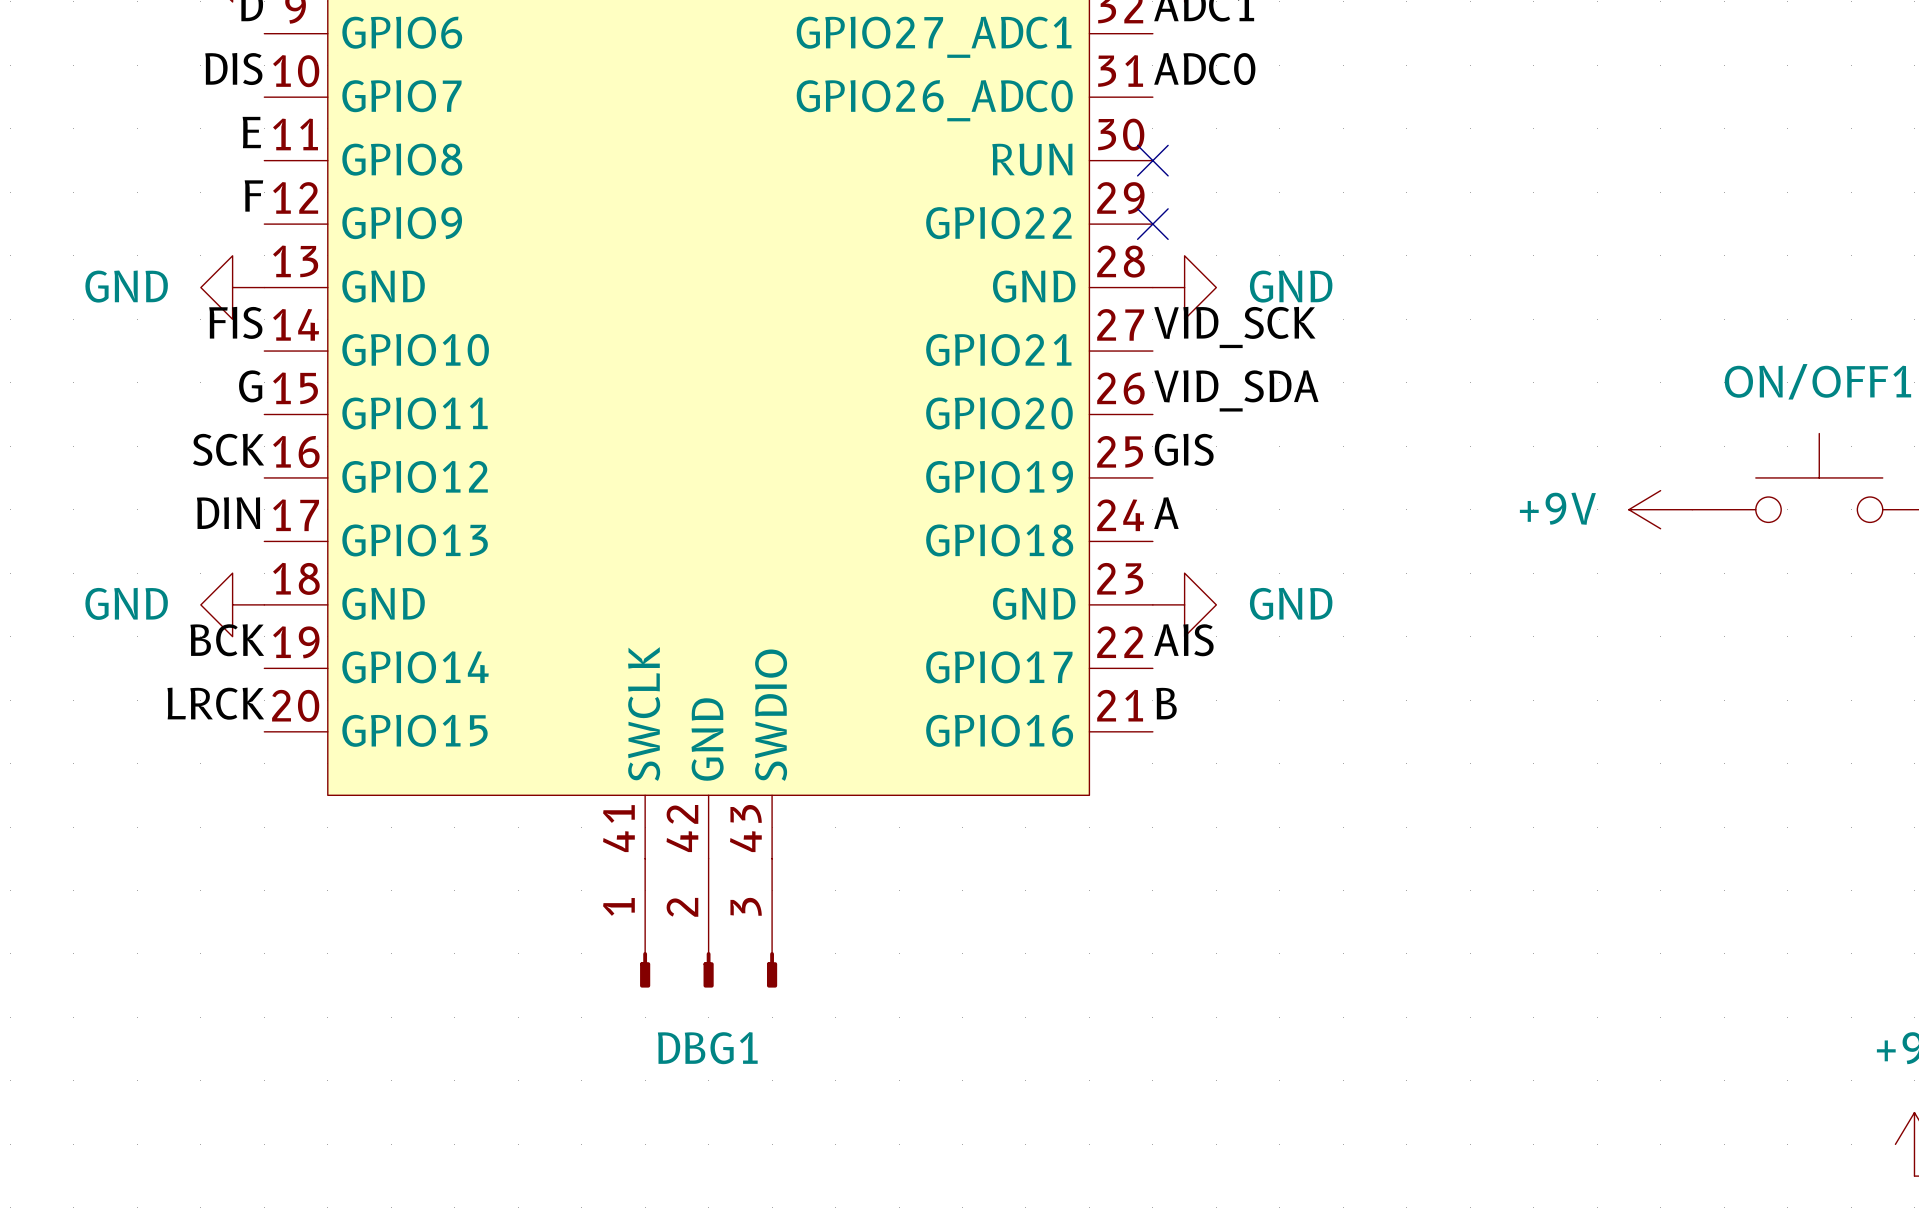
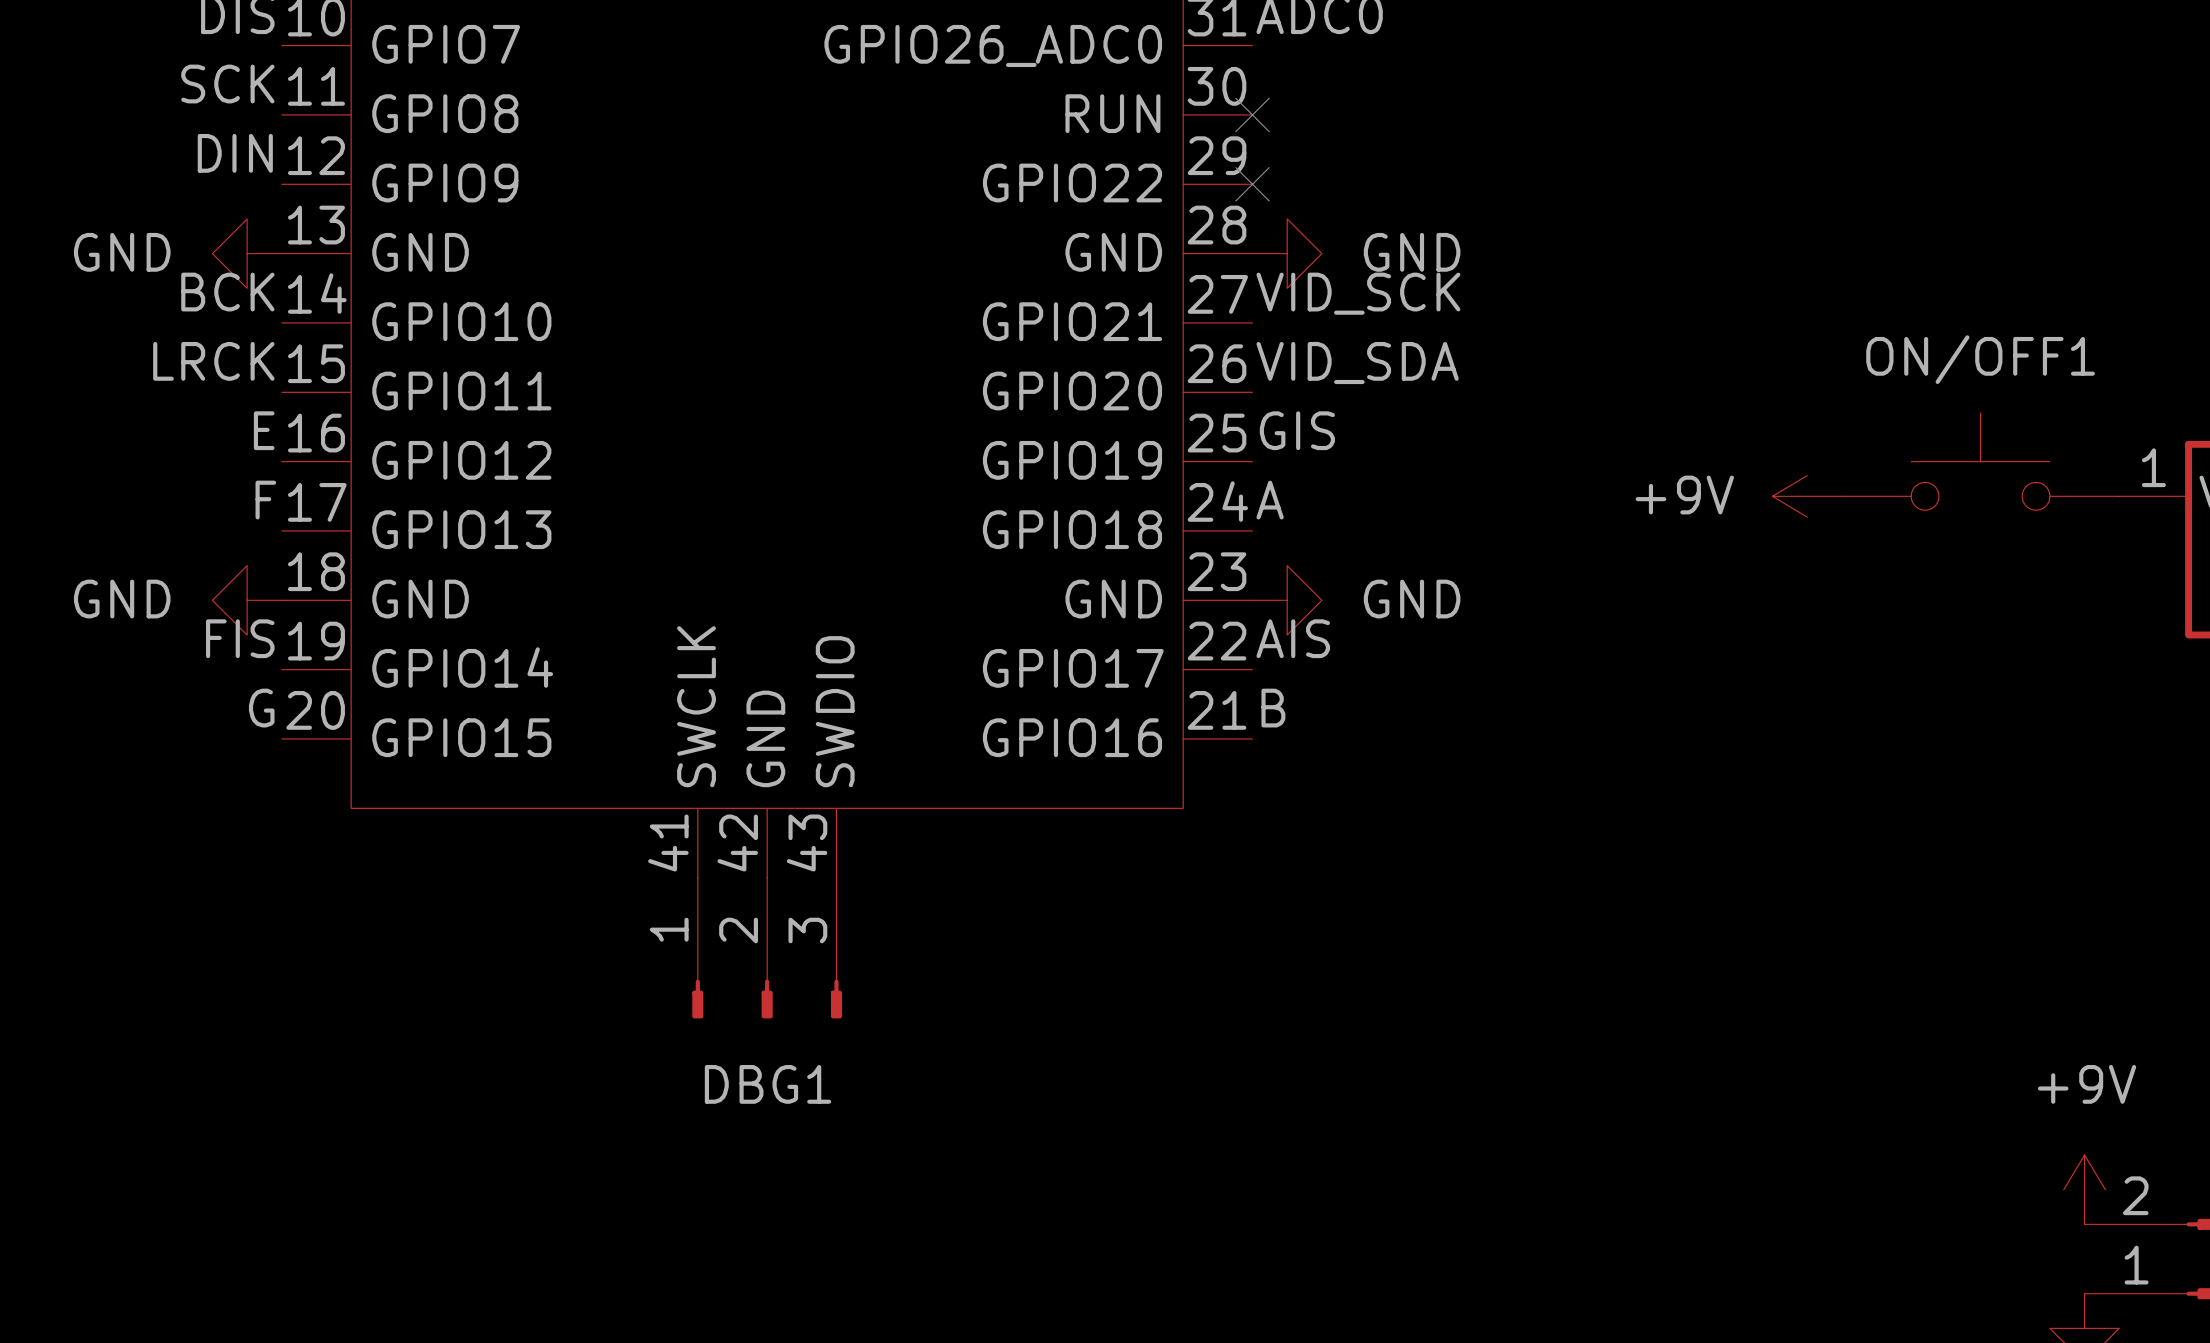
label: E (251, 132) -> SCK (227, 84)
label: F (253, 195) -> DIN (235, 153)
label: FIS (235, 322) -> BCK (227, 292)
label: G (250, 386) -> LRCK (213, 361)
label: SCK (228, 449) -> E (264, 430)
label: DIN (228, 513) -> F (265, 500)
label: BCK (227, 640) -> FIS (240, 638)
label: LRCK (215, 703) -> G (261, 708)

